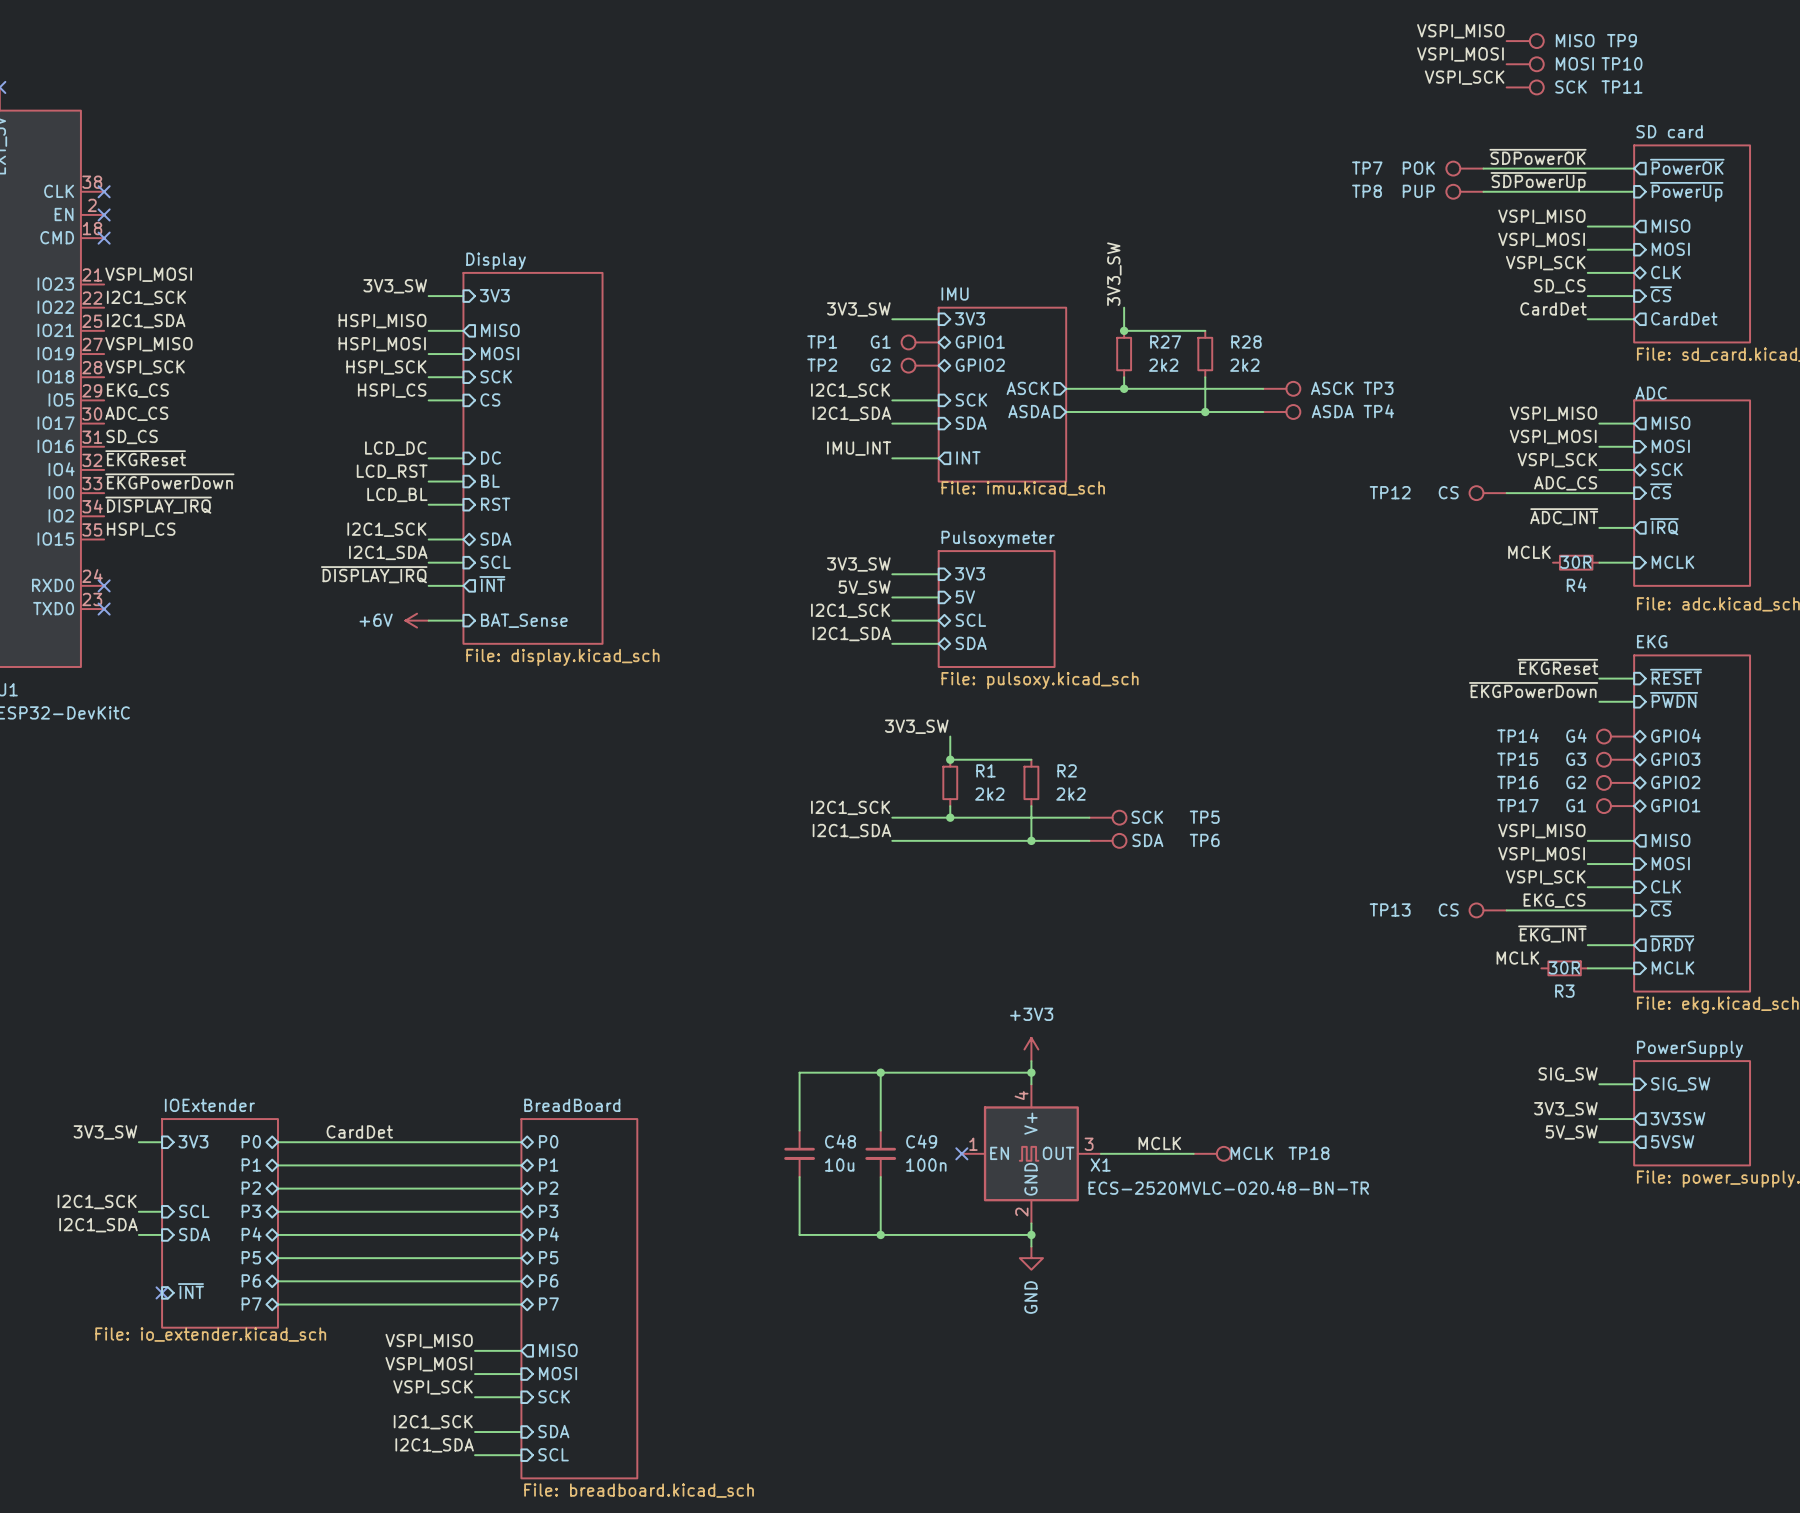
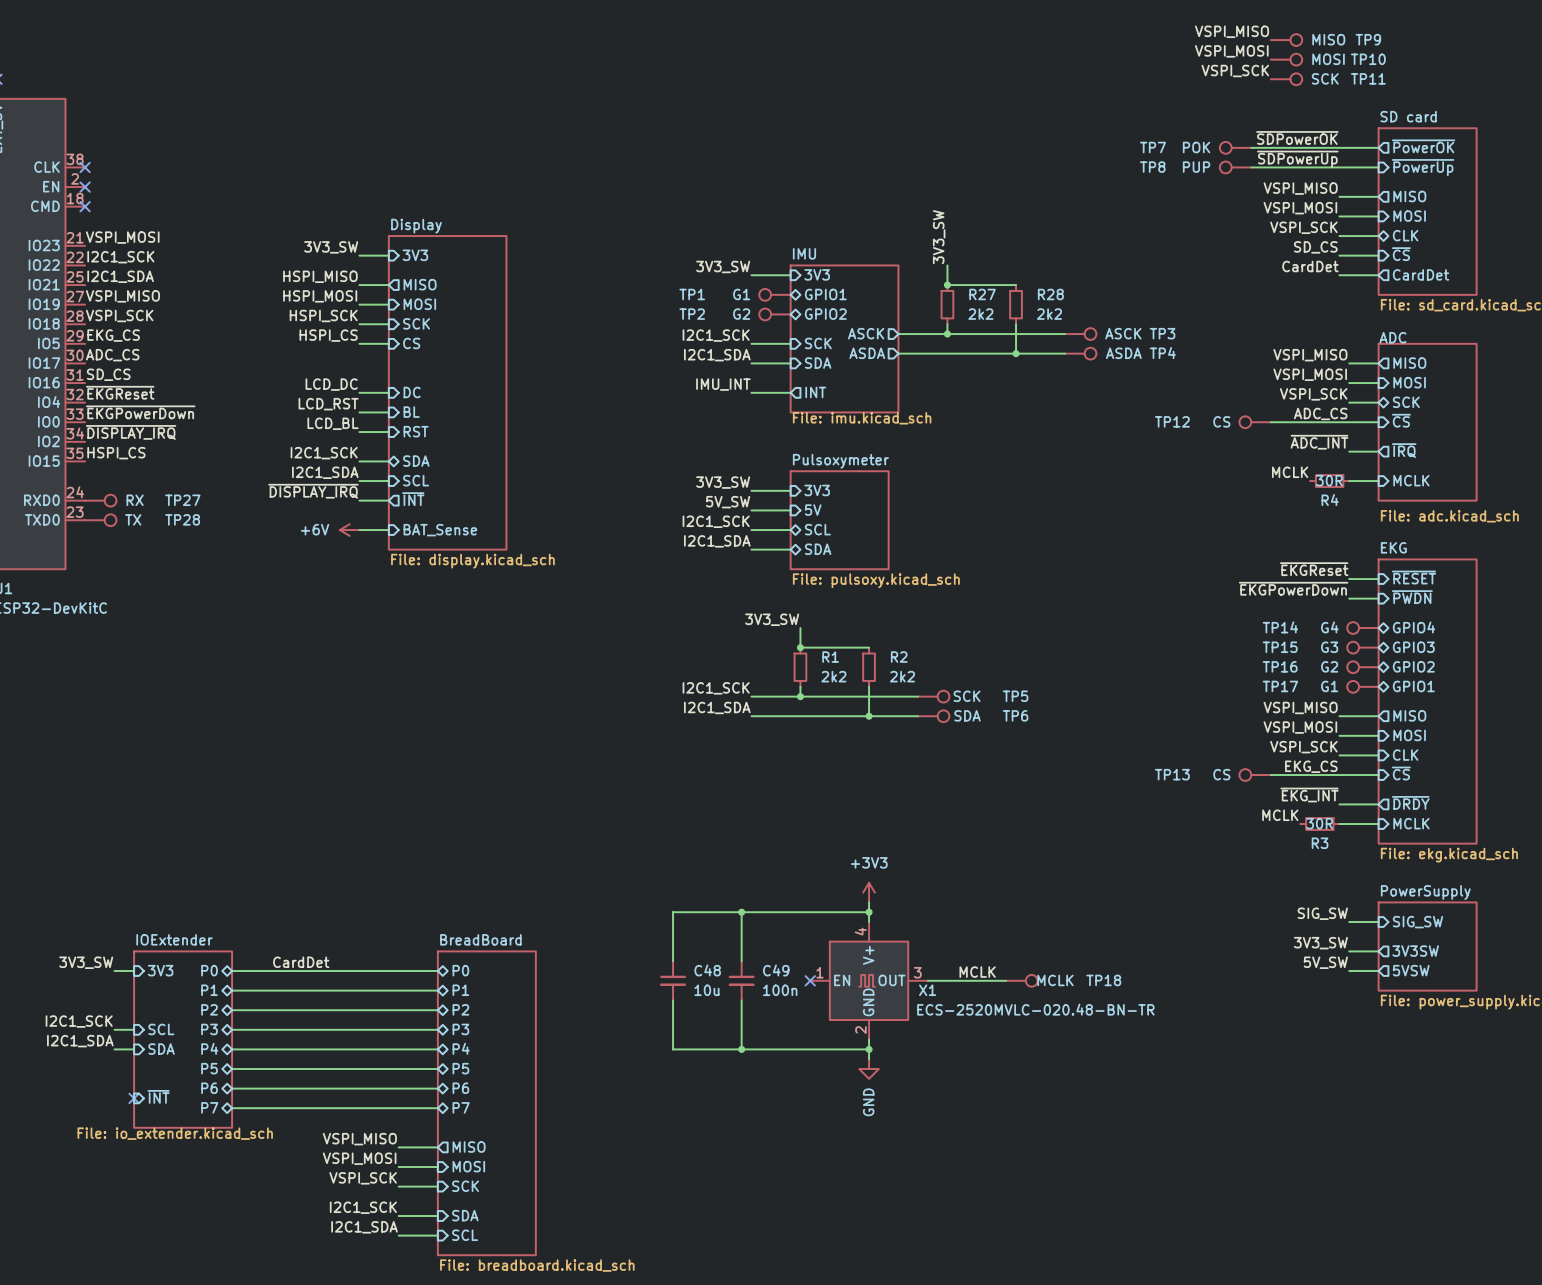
no-connect mark: (104, 585) -> none
TP27: none -> RX (100, 500)
no-connect mark: (104, 609) -> none
TP28: none -> TX (100, 520)

